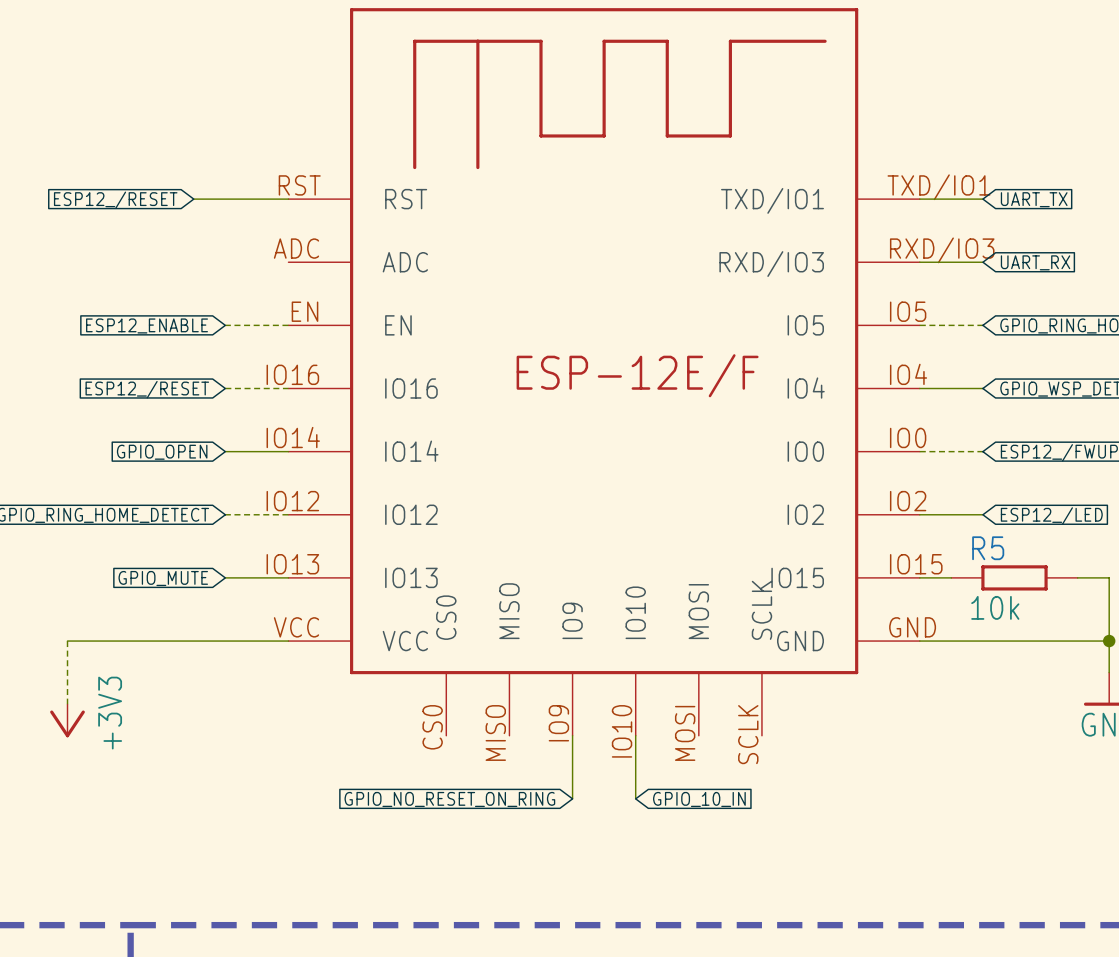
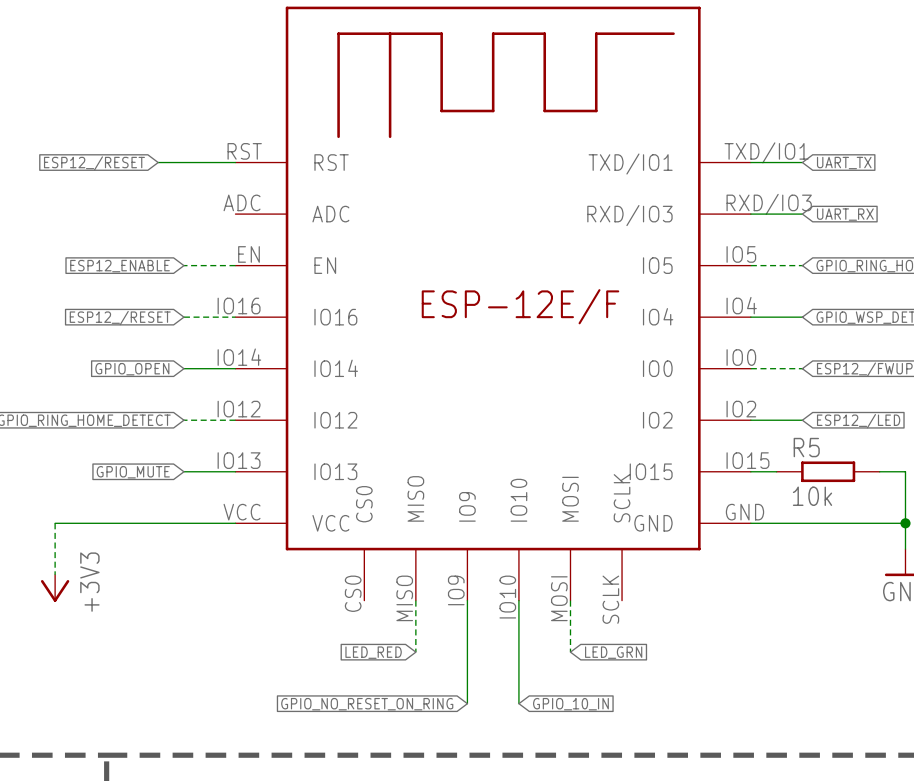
wire: none -> (415, 600) (415, 652)
wire: none -> (570, 600) (570, 652)
wire: none -> (467, 652) (467, 703)
wire: none -> (518, 652) (518, 703)
global label position: GPIO_NO_RESET_ON_RING (449, 799) -> GPIO_NO_RESET_ON_RING (367, 704)
global label: none -> LED_RED (373, 652)
global label position: GPIO_10_IN (699, 799) -> GPIO_10_IN (570, 704)
global label: none -> LED_GRN (613, 652)

